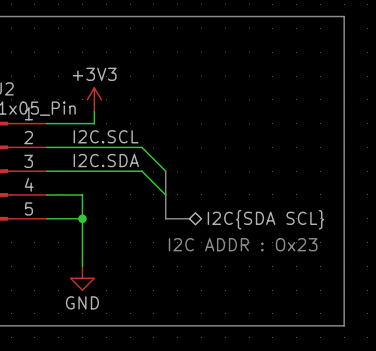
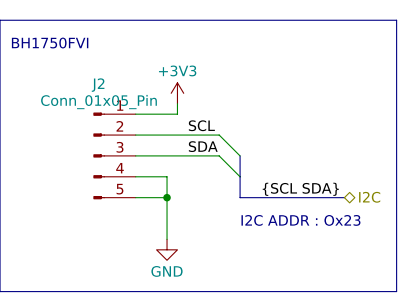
label: I2C.SCL (106, 136) -> none
label: none -> SCL (201, 125)
label: I2C.SDA (106, 160) -> none
label: none -> SDA (203, 146)
label: none -> {SCL SDA} (300, 189)
bus: none -> (260, 197) (344, 197)
hierarchical label: none -> I2C (369, 197)
hierarchical label: I2C{SDA SCL} (265, 219) -> none

